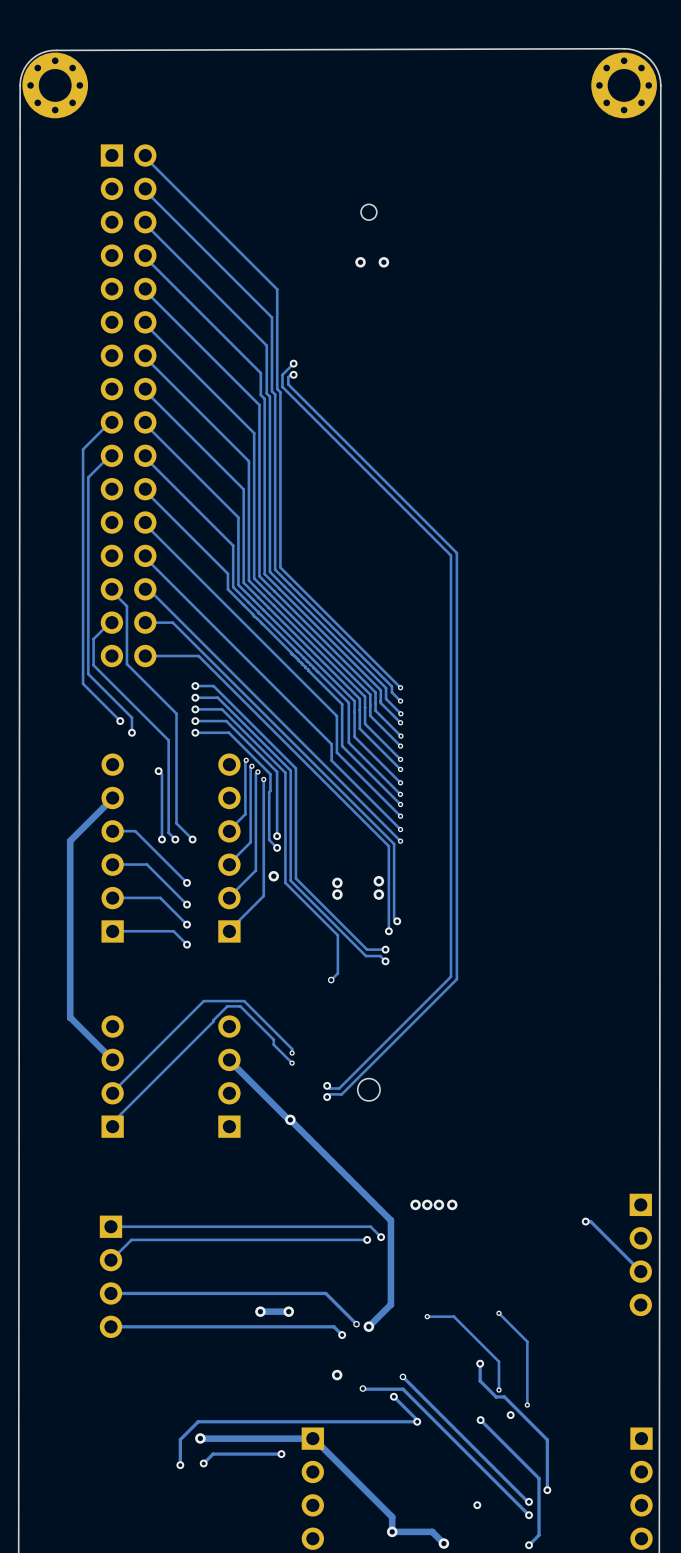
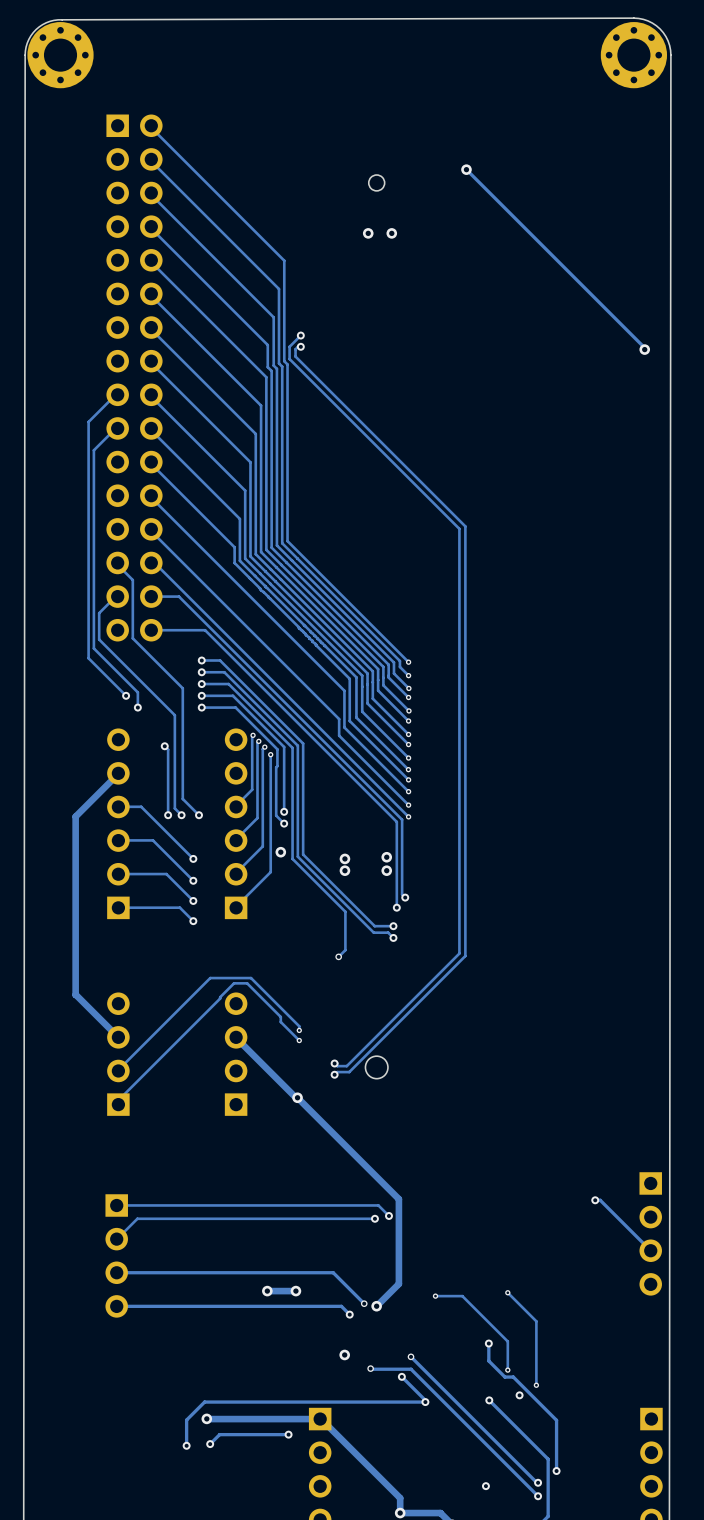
track: none -> (466, 169) (644, 349)
via: none -> (466, 169)
via: none -> (644, 349)
via: (415, 1204) -> none
via: (427, 1204) -> none
via: (438, 1204) -> none
via: (452, 1204) -> none

